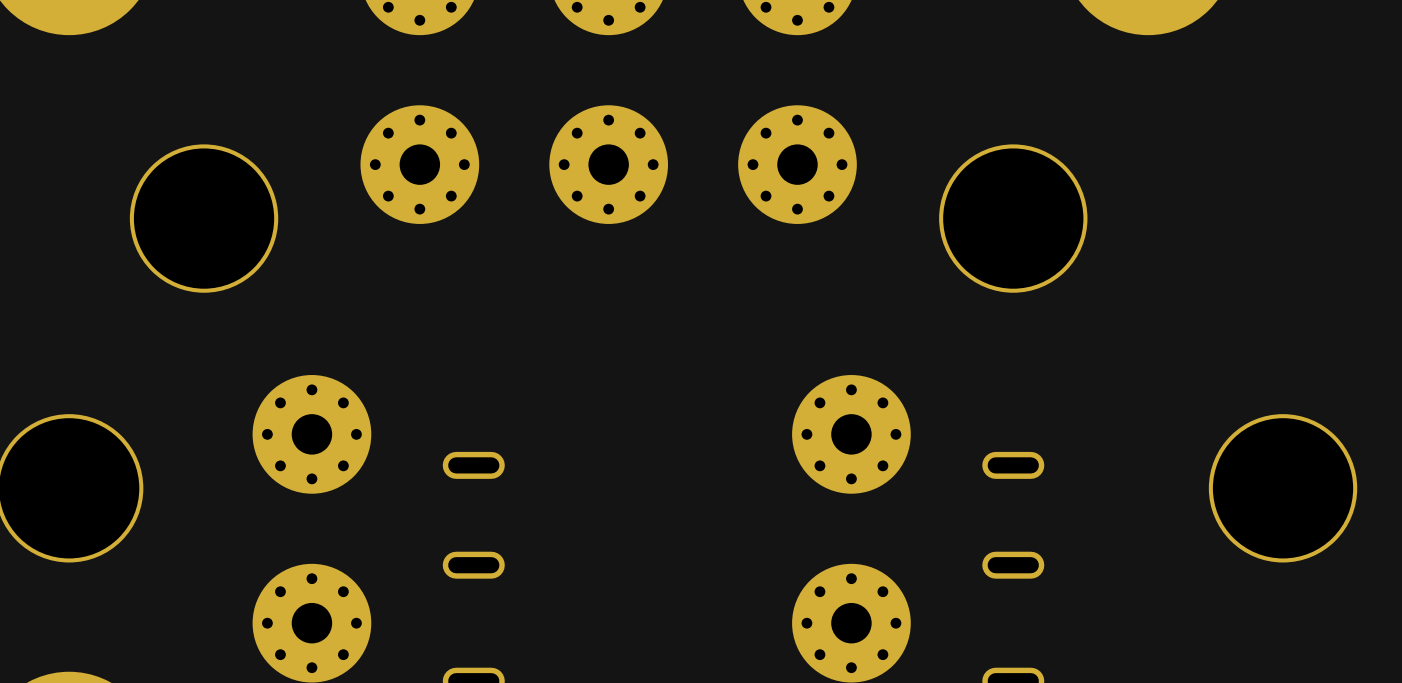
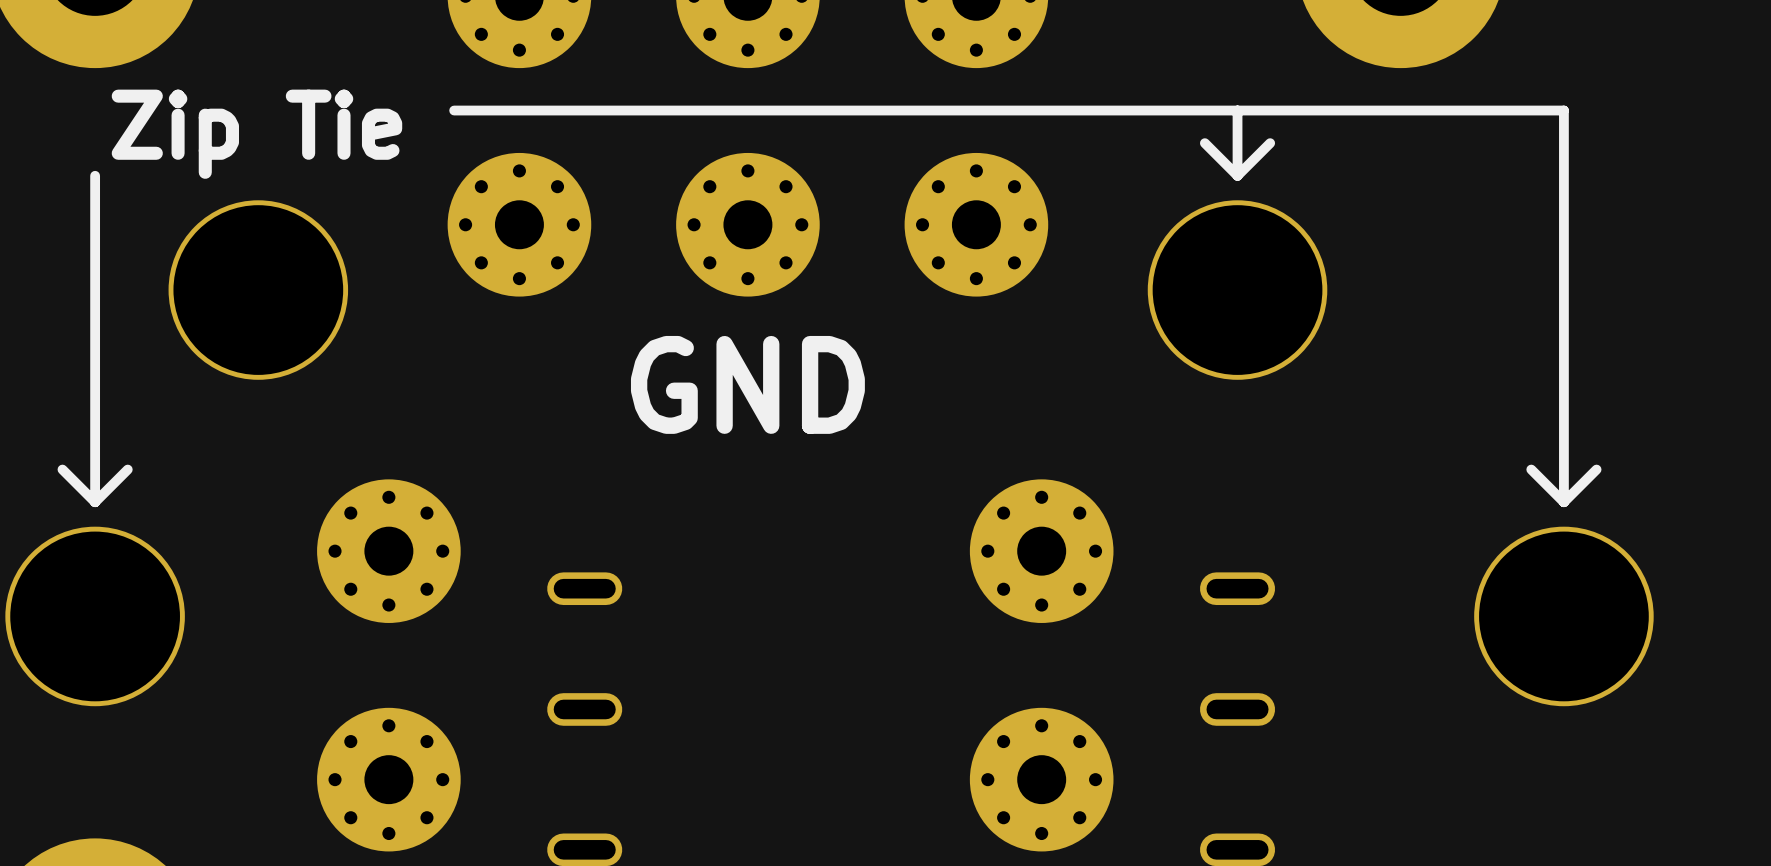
line: none -> (454, 110) (1563, 110) (1563, 502)
line: none -> (1237, 110) (1237, 175)
text: none -> Zip Tie (256, 134)
line: none -> (1204, 143) (1237, 175)
line: none -> (1270, 143) (1237, 175)
line: none -> (95, 175) (95, 502)
text: none -> GND (747, 384)
line: none -> (62, 469) (95, 502)
line: none -> (127, 469) (95, 502)
line: none -> (1531, 469) (1563, 502)
line: none -> (1596, 469) (1563, 502)

